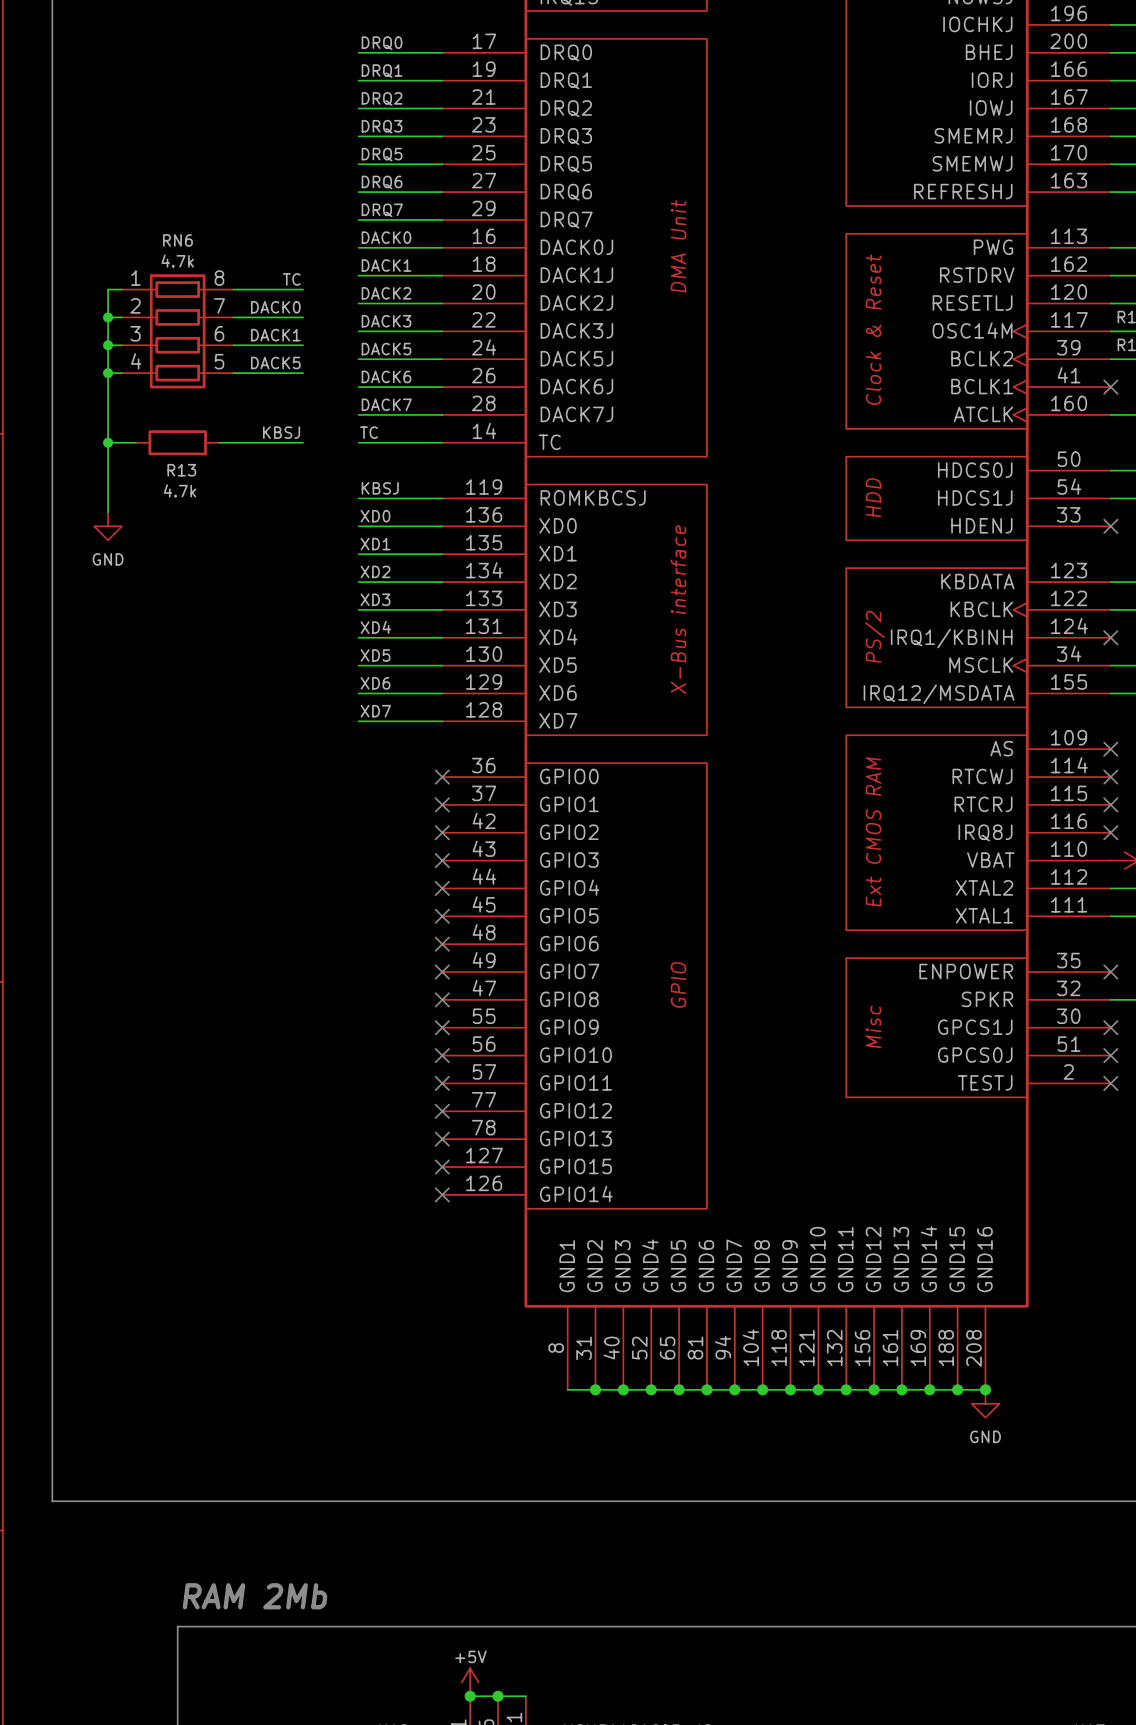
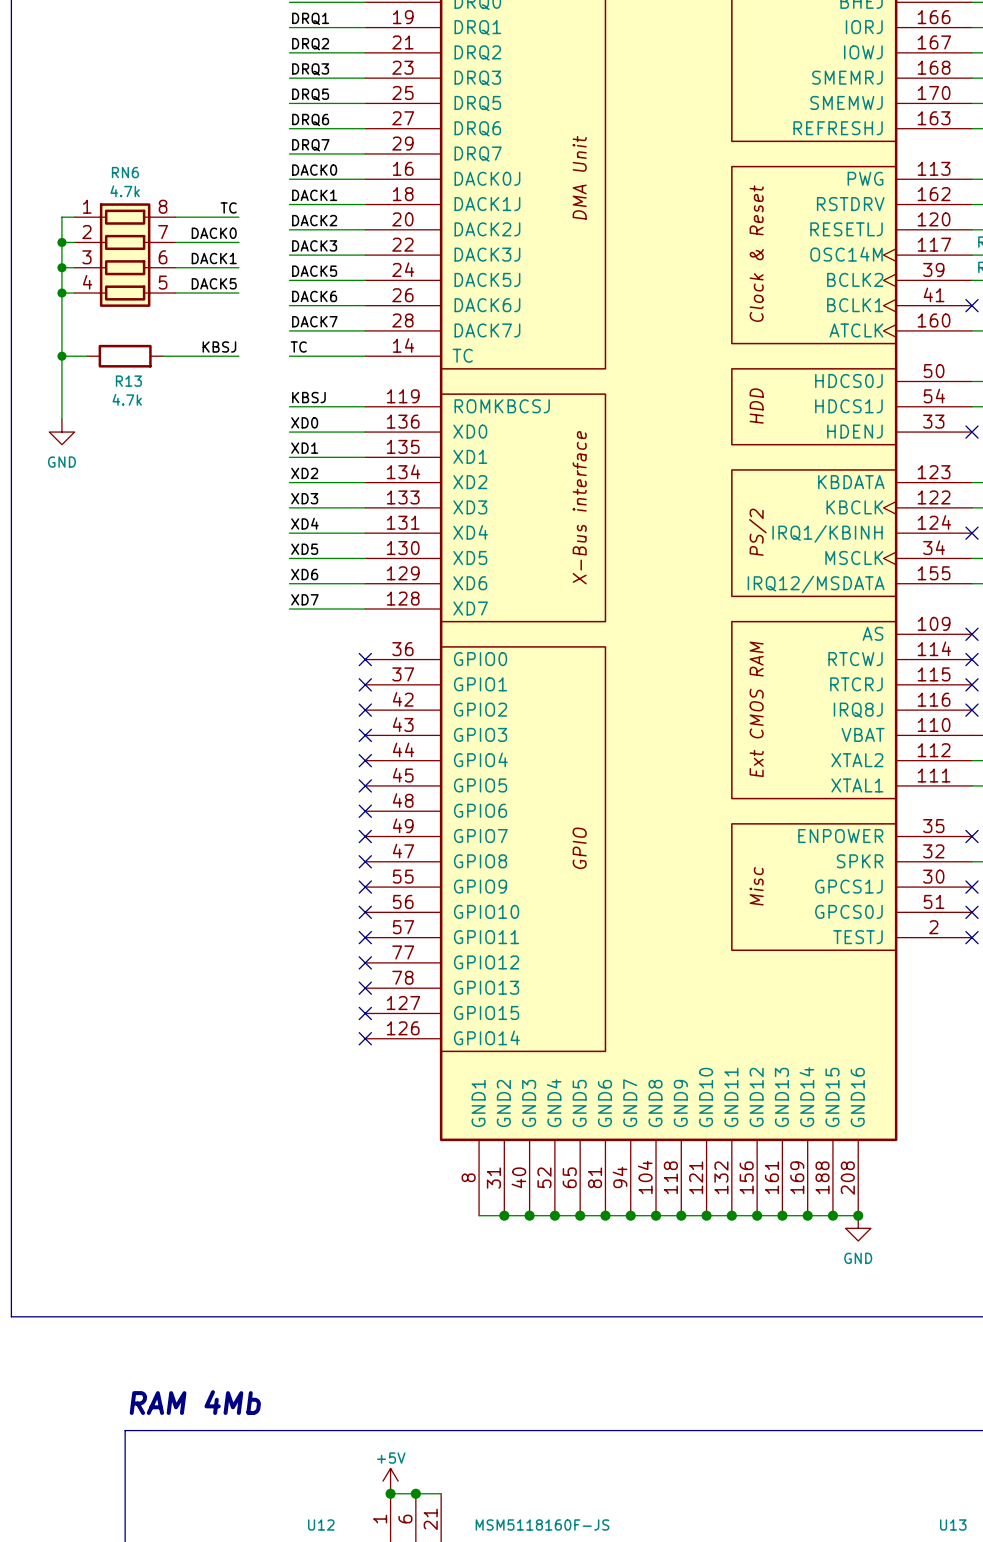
text: RAM 2Mb (255, 1596) -> RAM 4Mb (195, 1402)

